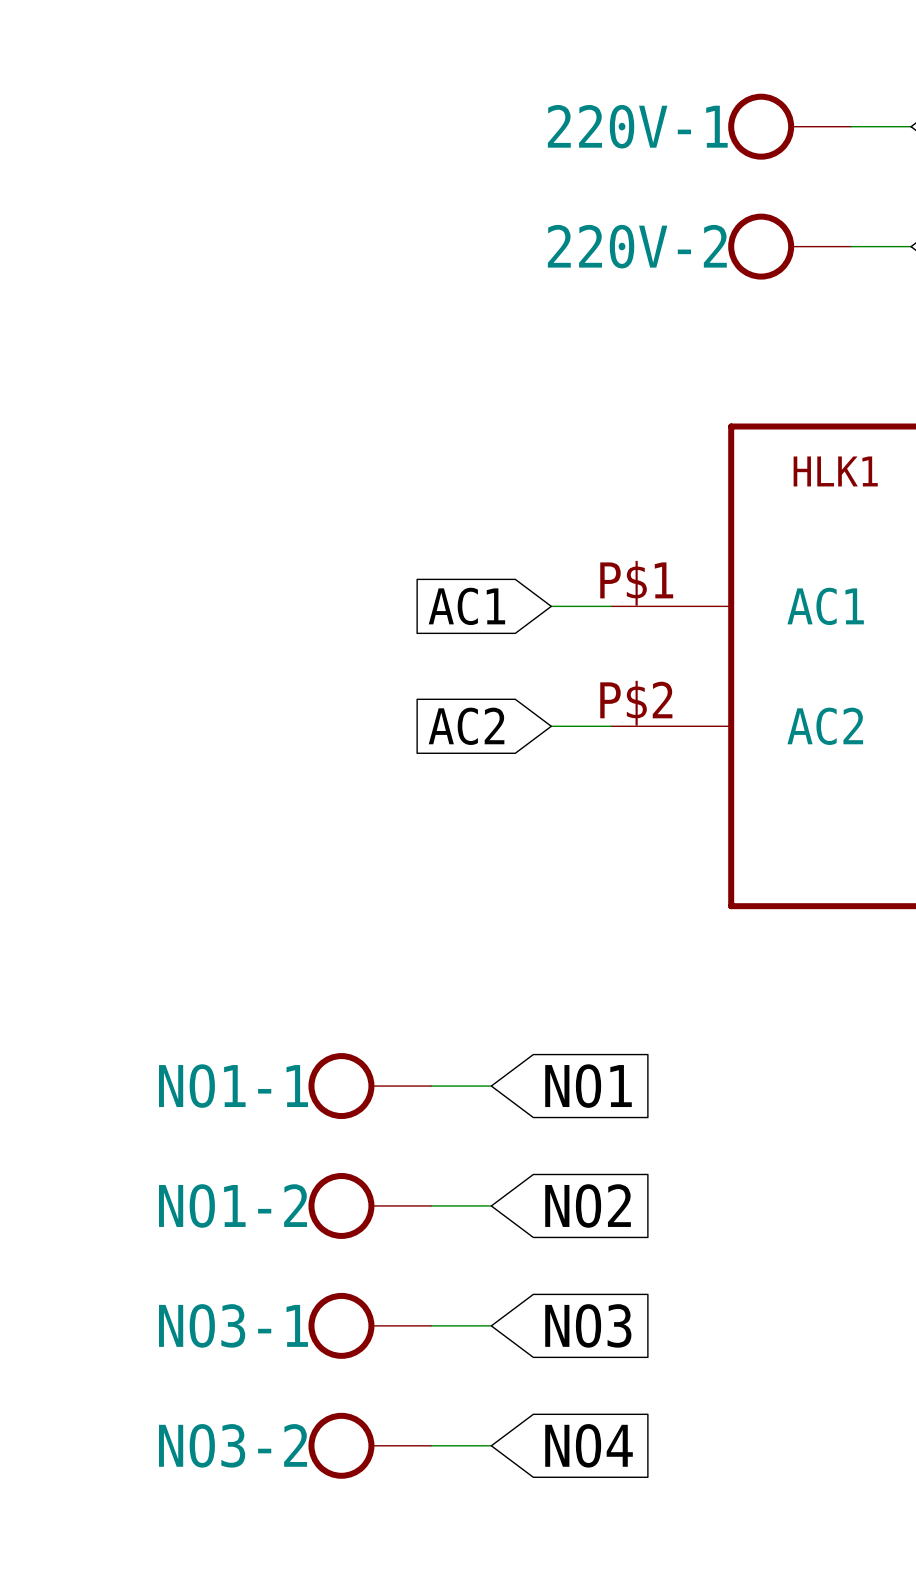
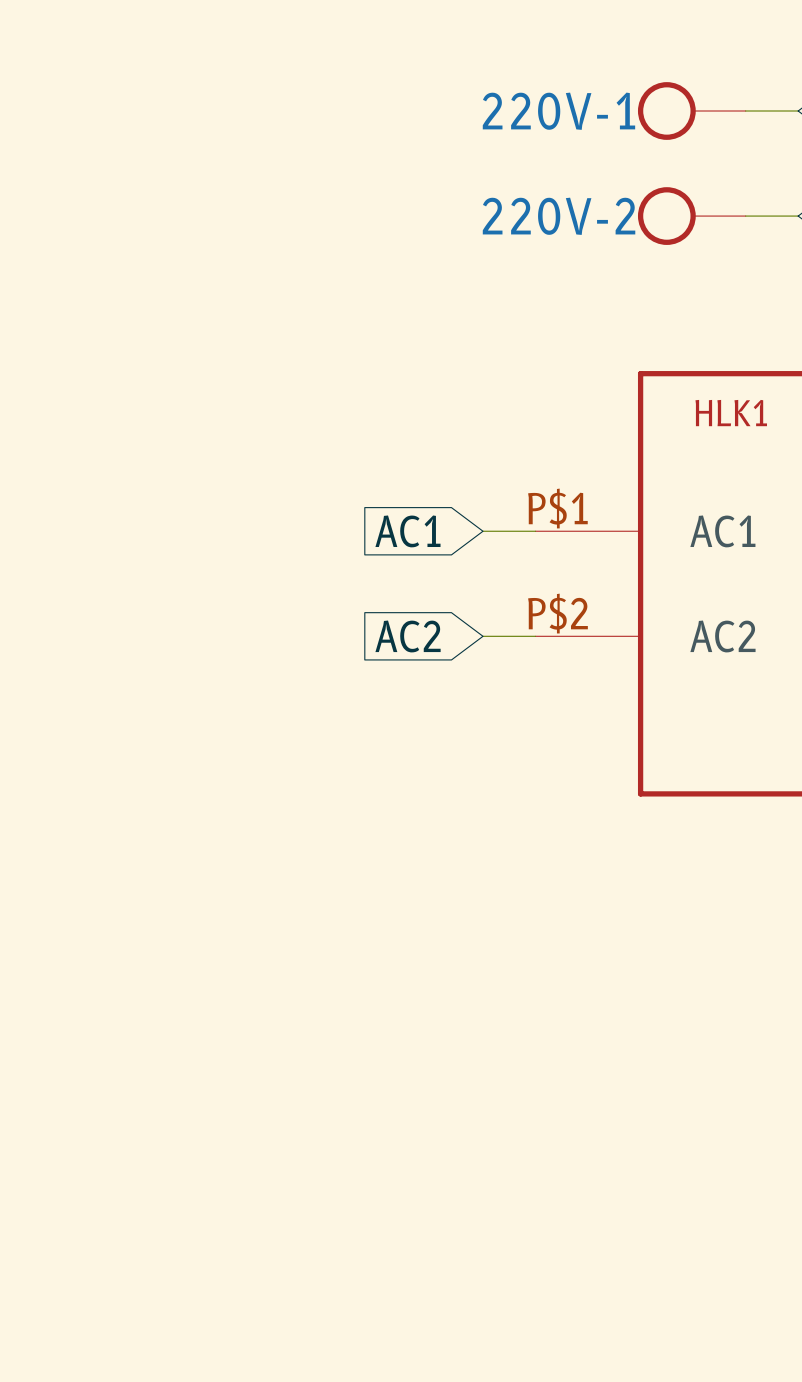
NO1-1: (369, 1086) -> none
wire: (431, 1086) (491, 1086) -> none
global label: NO1 (588, 1086) -> none
NO1-2: (369, 1205) -> none
wire: (431, 1205) (491, 1205) -> none
global label: NO2 (588, 1205) -> none
NO3-1: (369, 1325) -> none
wire: (431, 1325) (491, 1325) -> none
global label: NO3 (588, 1325) -> none
NO3-2: (369, 1445) -> none
wire: (431, 1445) (491, 1445) -> none
global label: NO4 (589, 1445) -> none

